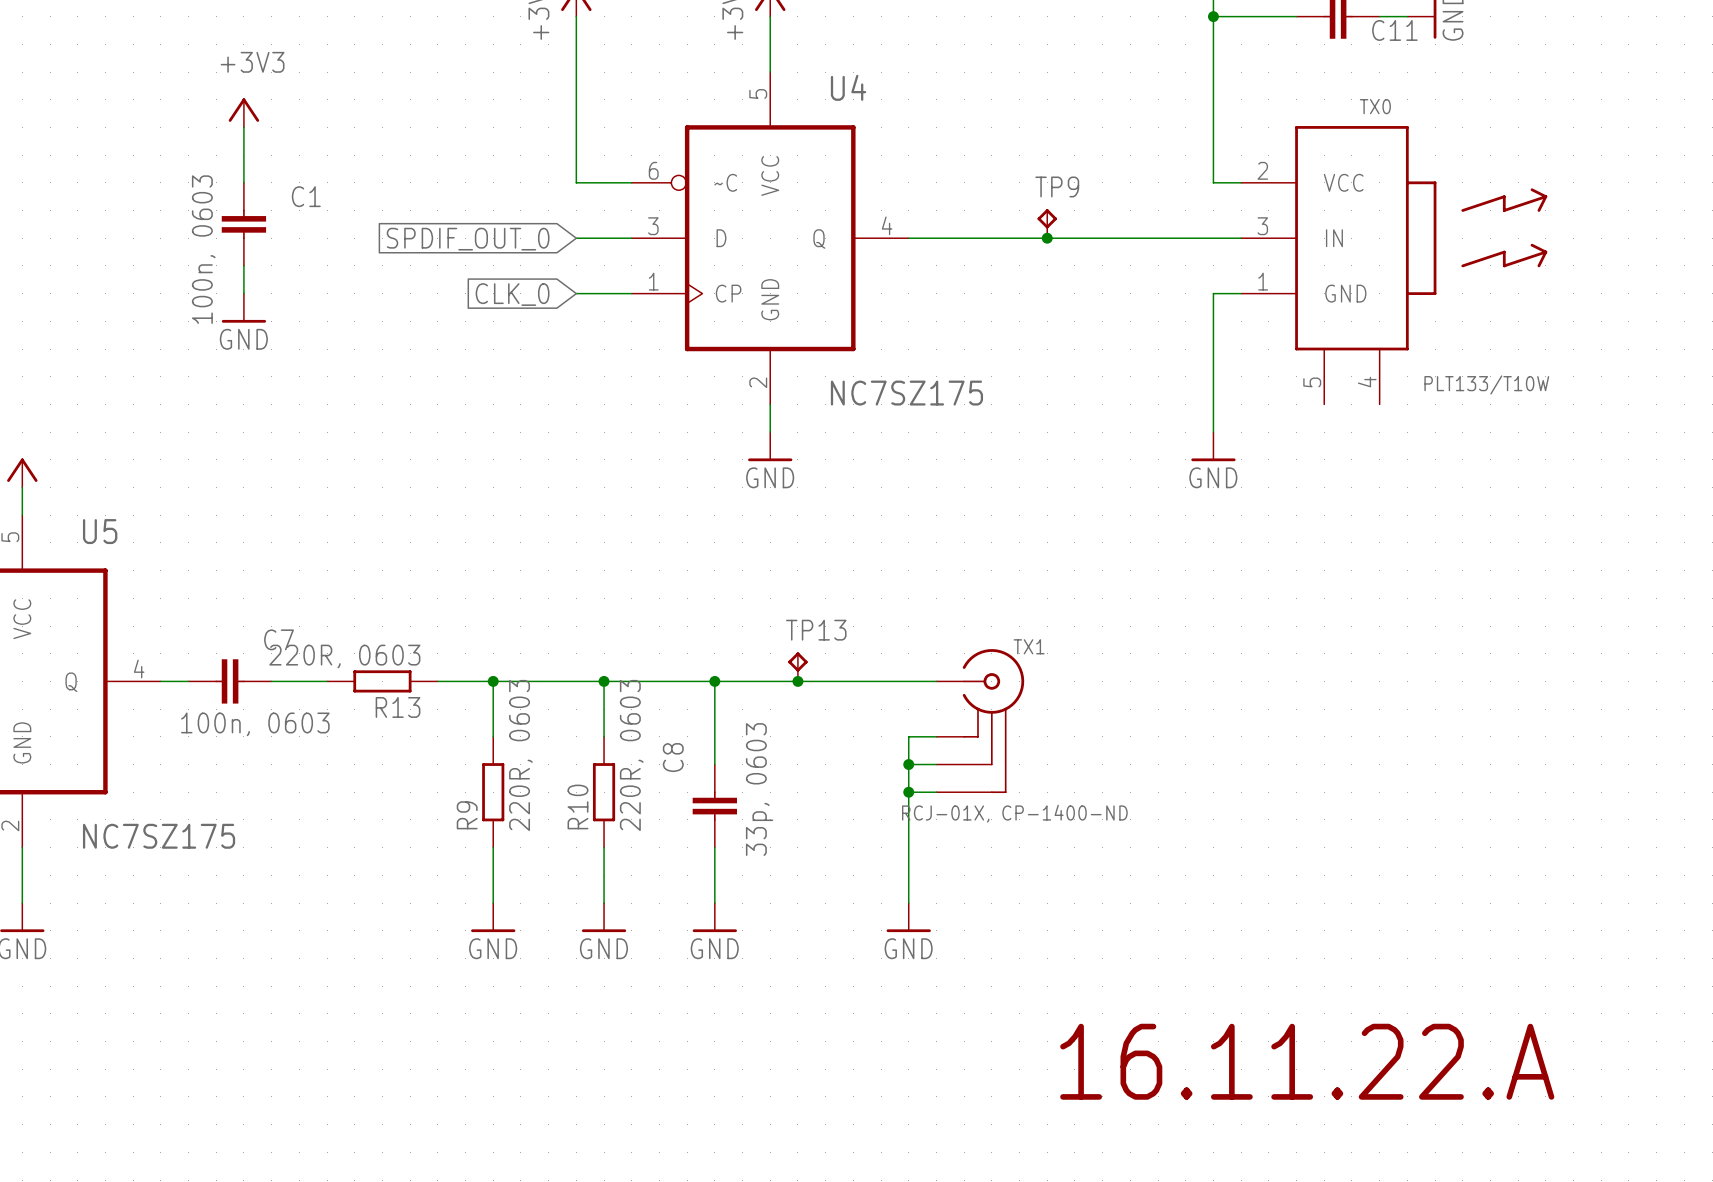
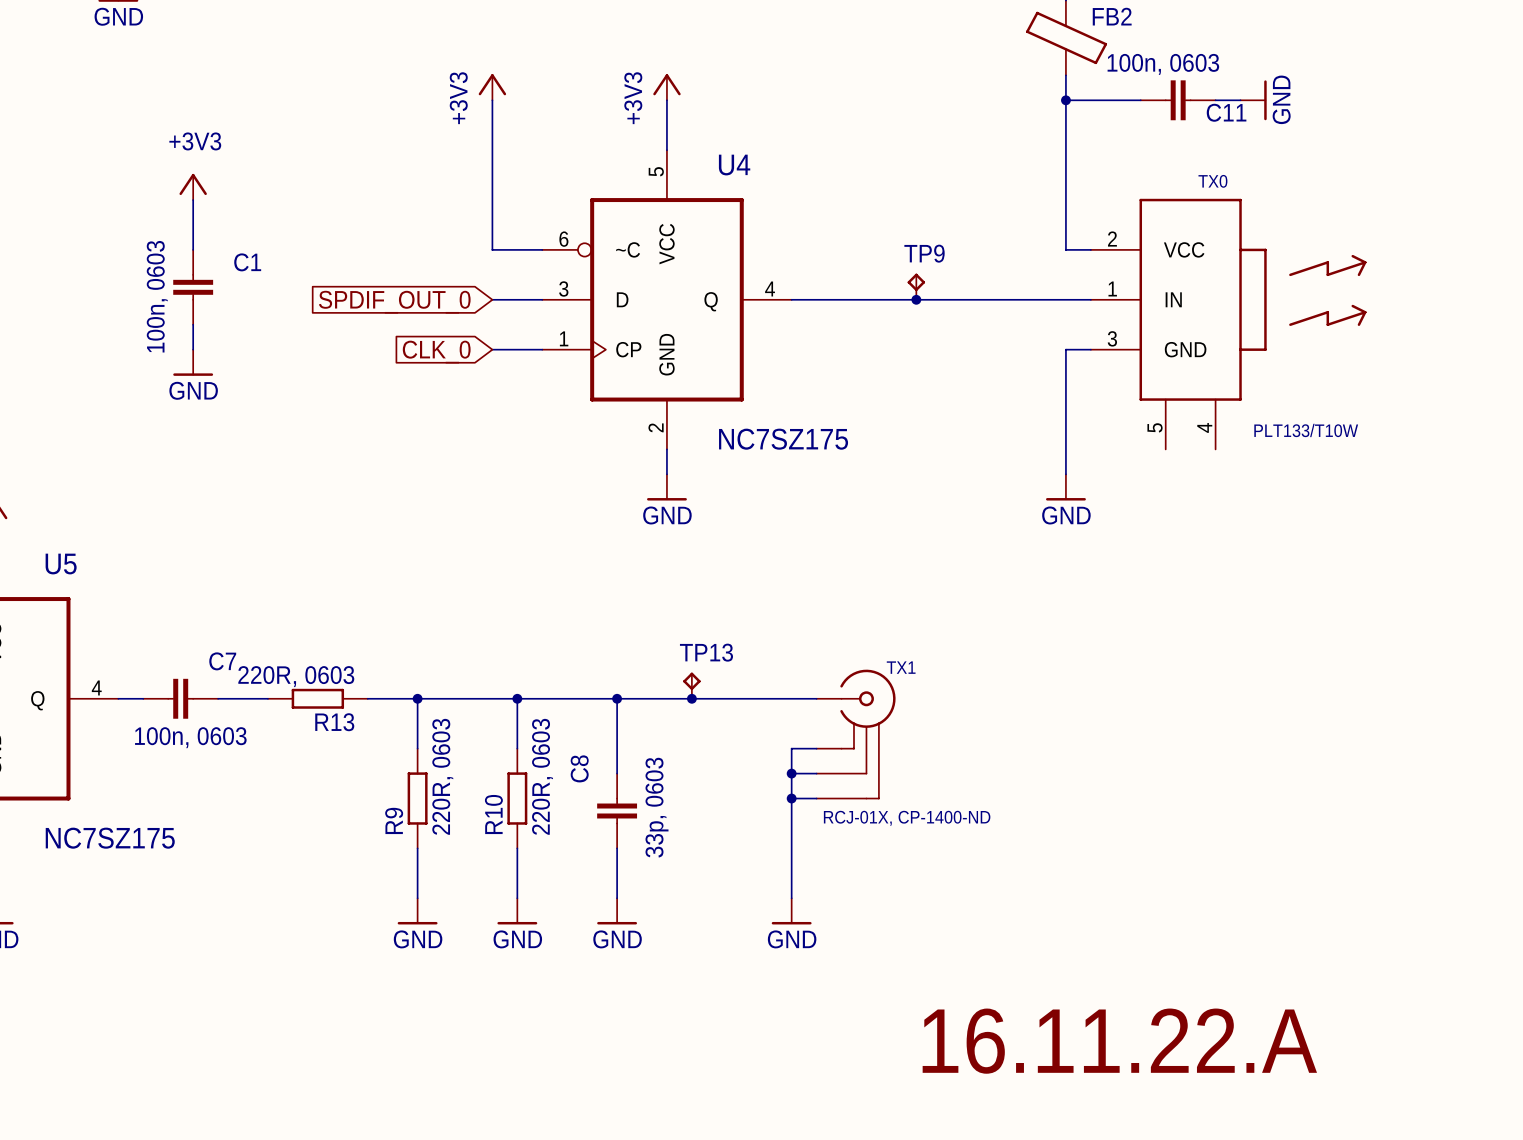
TX0 pin number: 3 (1262, 226) -> 1 (1112, 288)
TX0 pin number: 1 (1263, 281) -> 3 (1112, 338)

